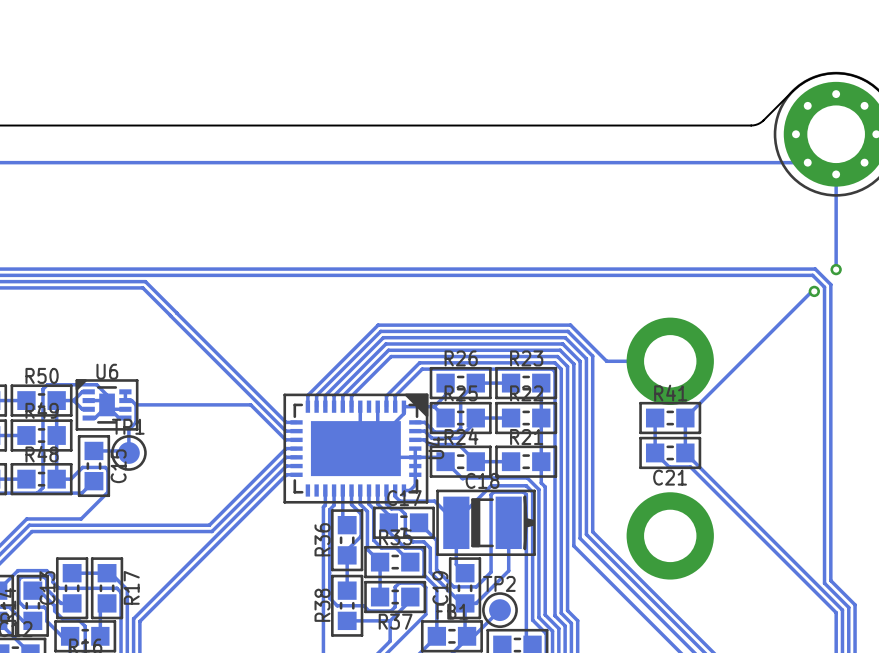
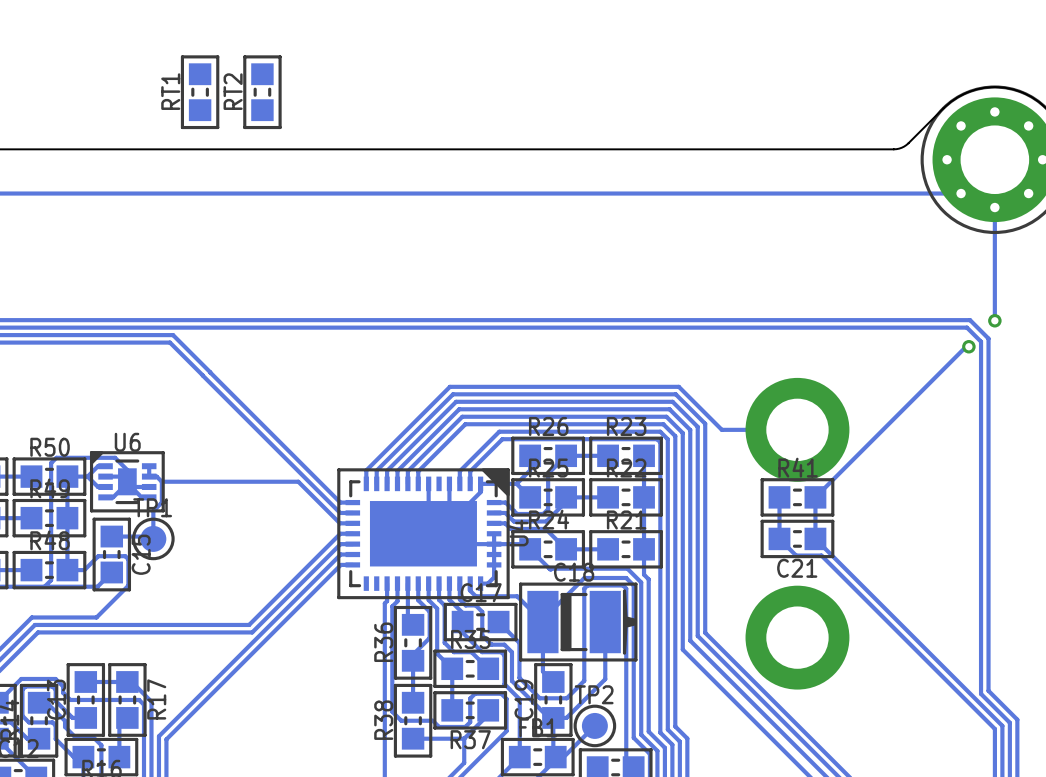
RT1: none -> (200, 92)
RT2: none -> (262, 92)

